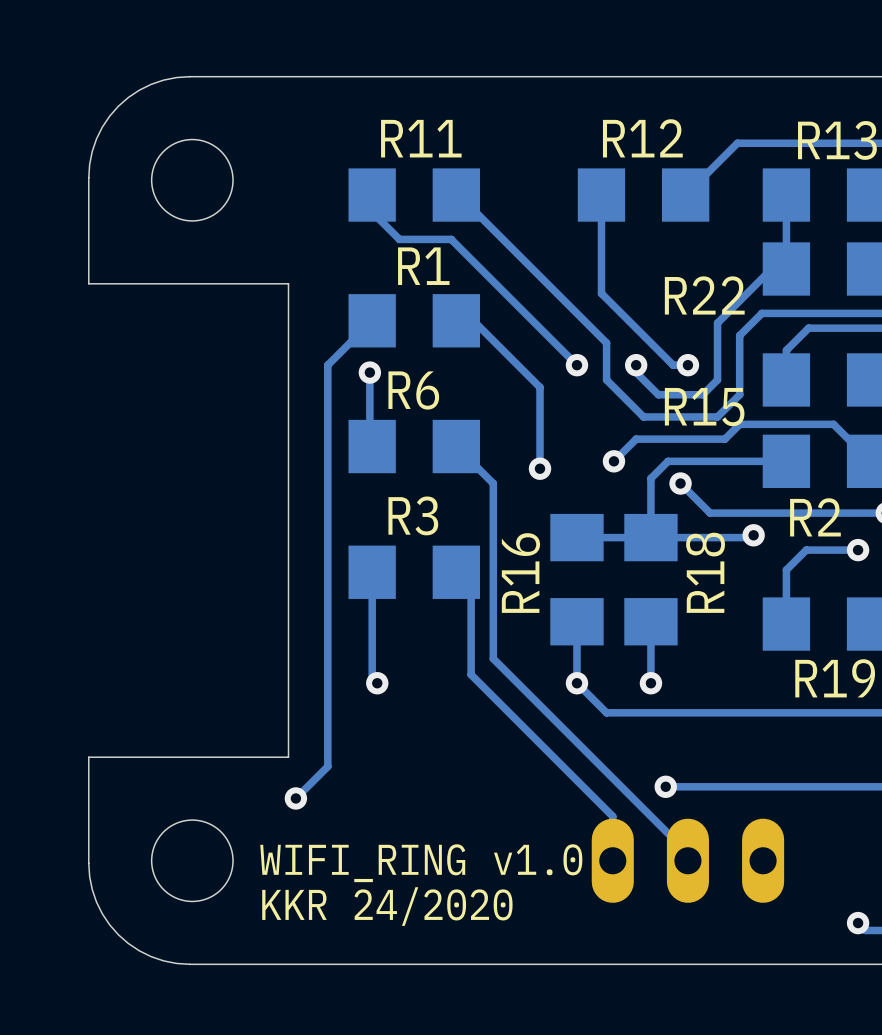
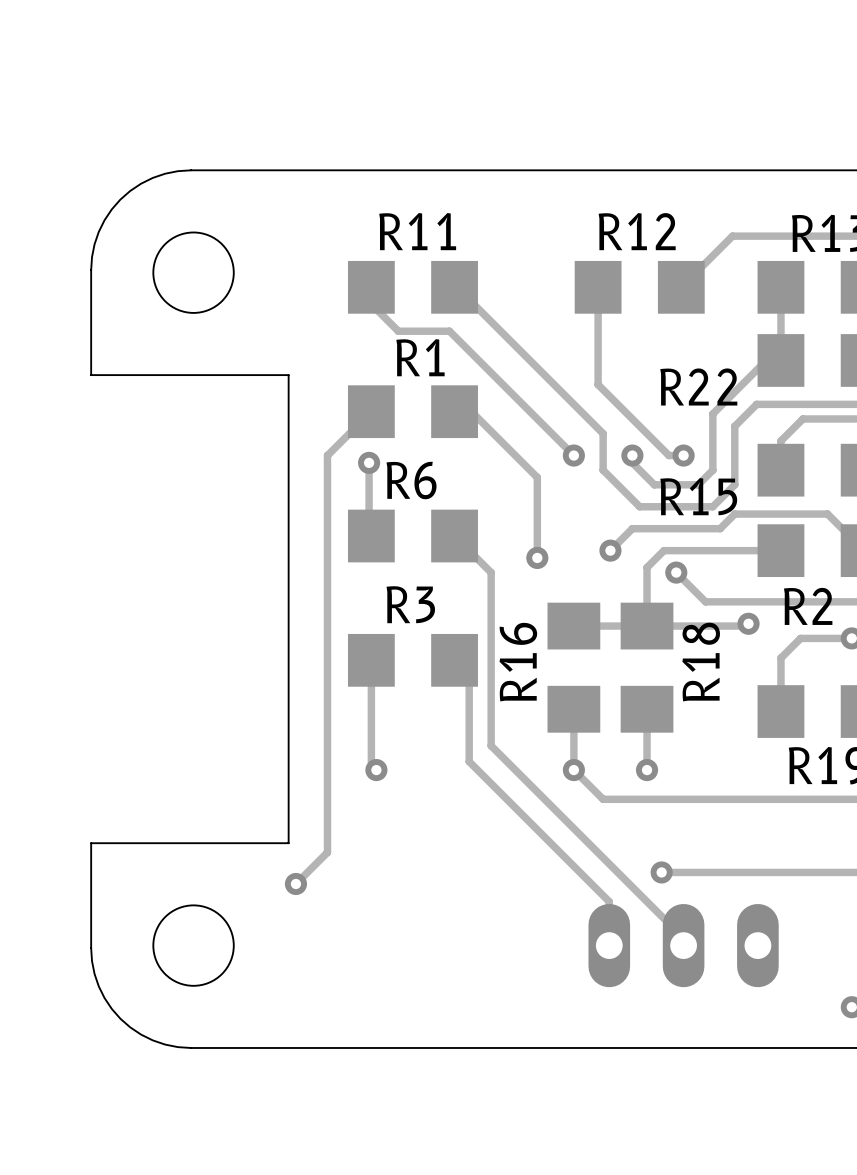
text: WIFI_RING v1.0 (421, 863) -> none
text: KKR 24/2020 (387, 906) -> none

